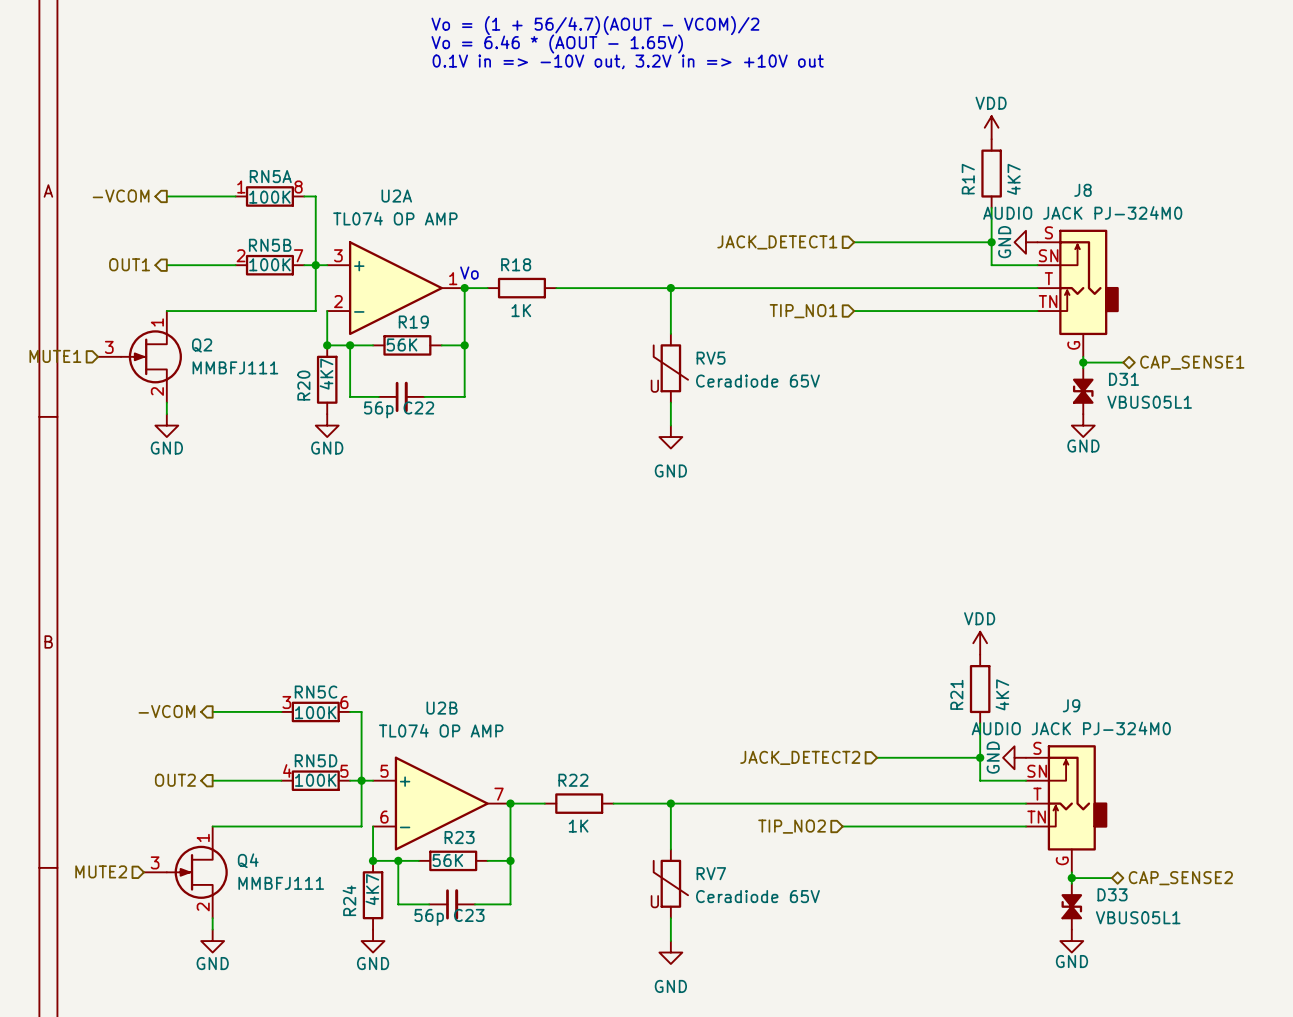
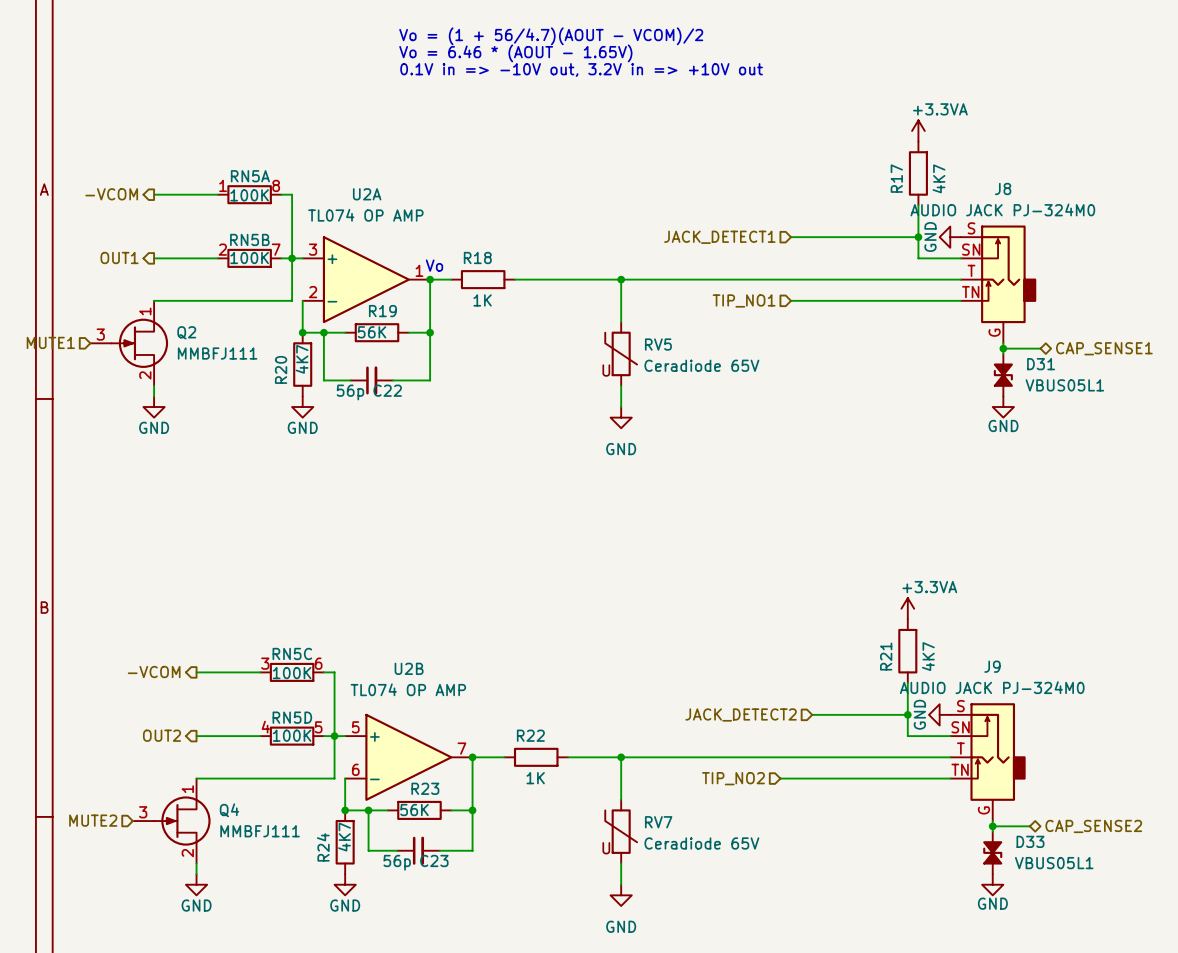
power symbol: VDD (991, 127) -> +3.3VA (918, 130)
power symbol: VDD (980, 643) -> +3.3VA (907, 608)

